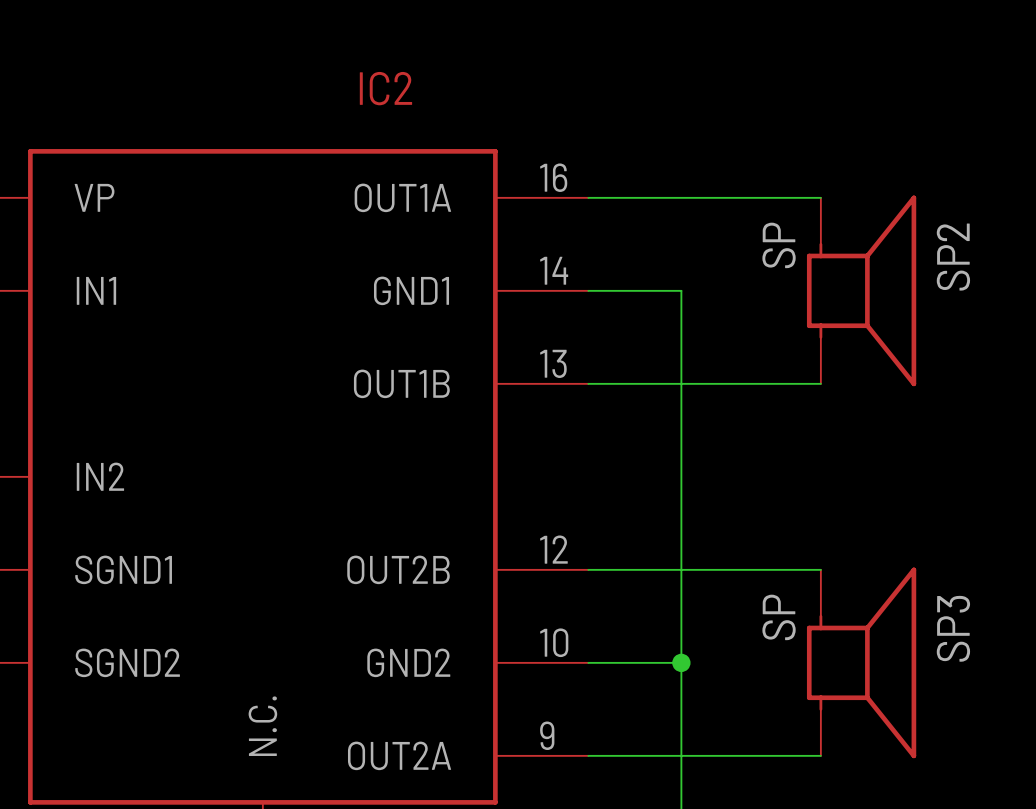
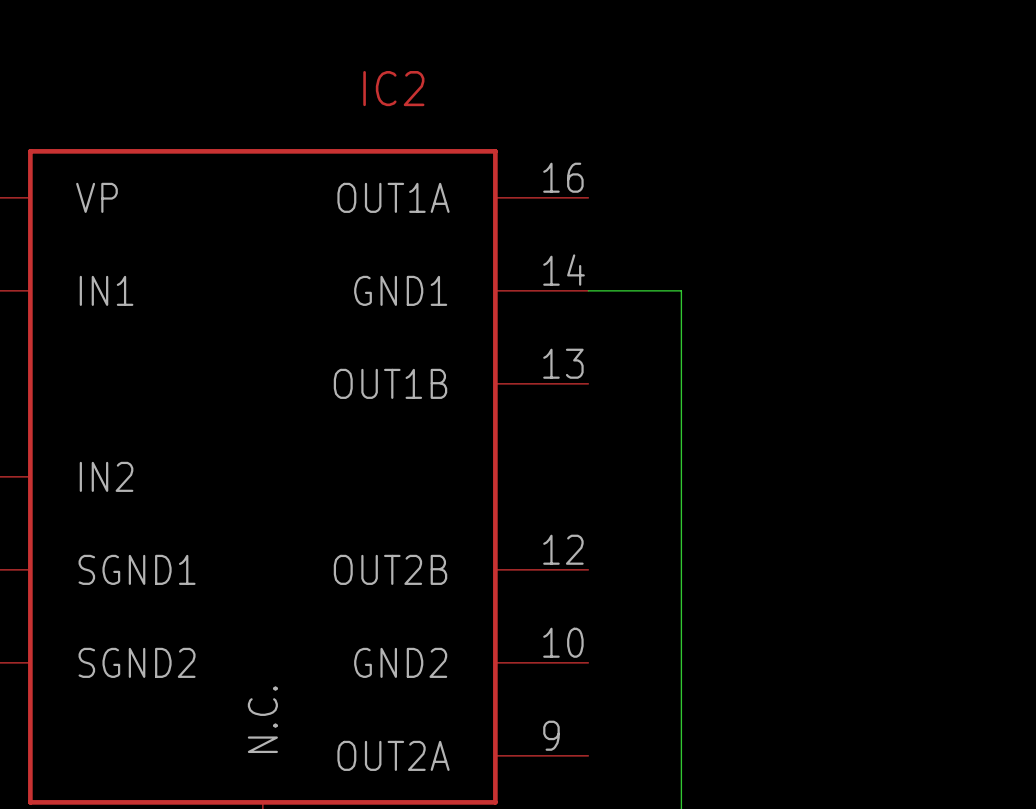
wire: (588, 197) (820, 197) -> none
SP2: SP (861, 290) -> none
wire: (588, 383) (820, 383) -> none
wire: (588, 569) (820, 569) -> none
wire: (588, 662) (681, 662) -> none
junction: (681, 662) -> none
SP3: SP (861, 662) -> none
wire: (588, 755) (820, 755) -> none

